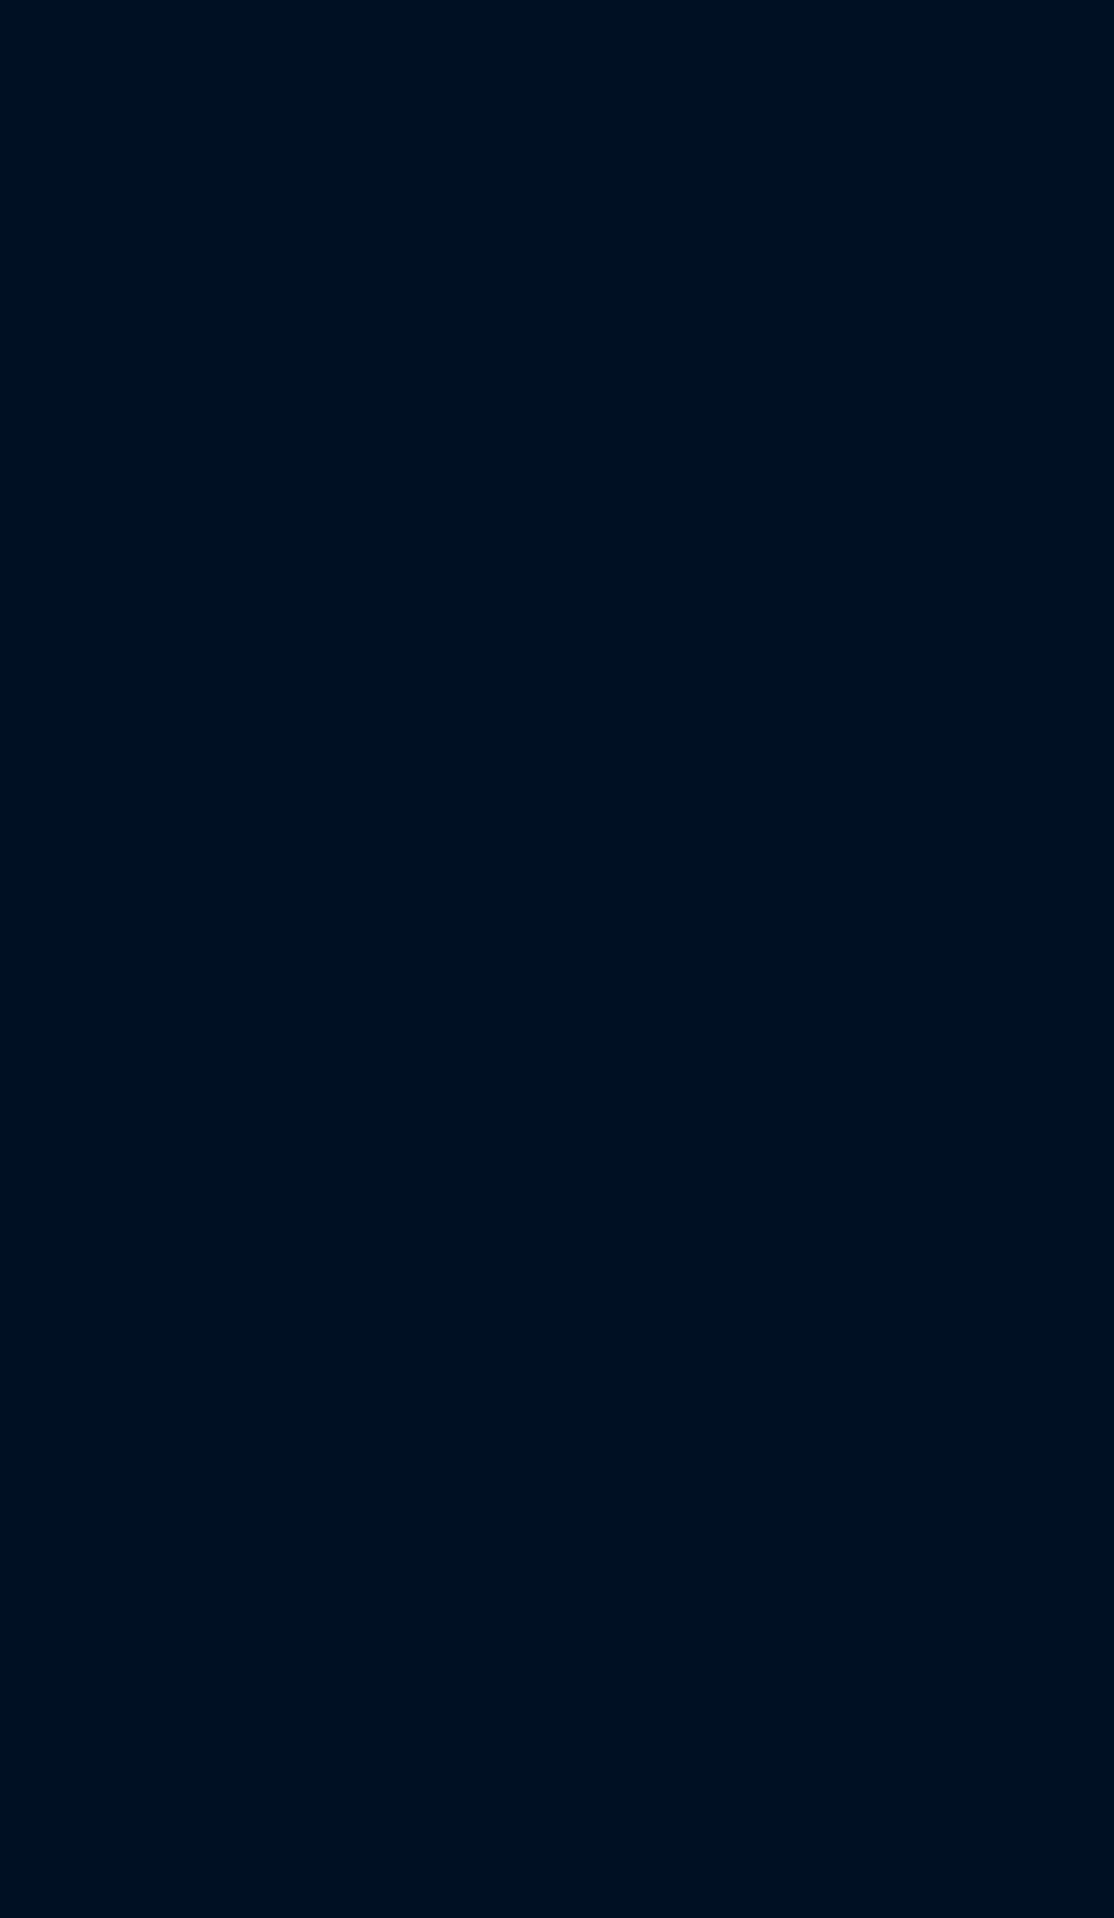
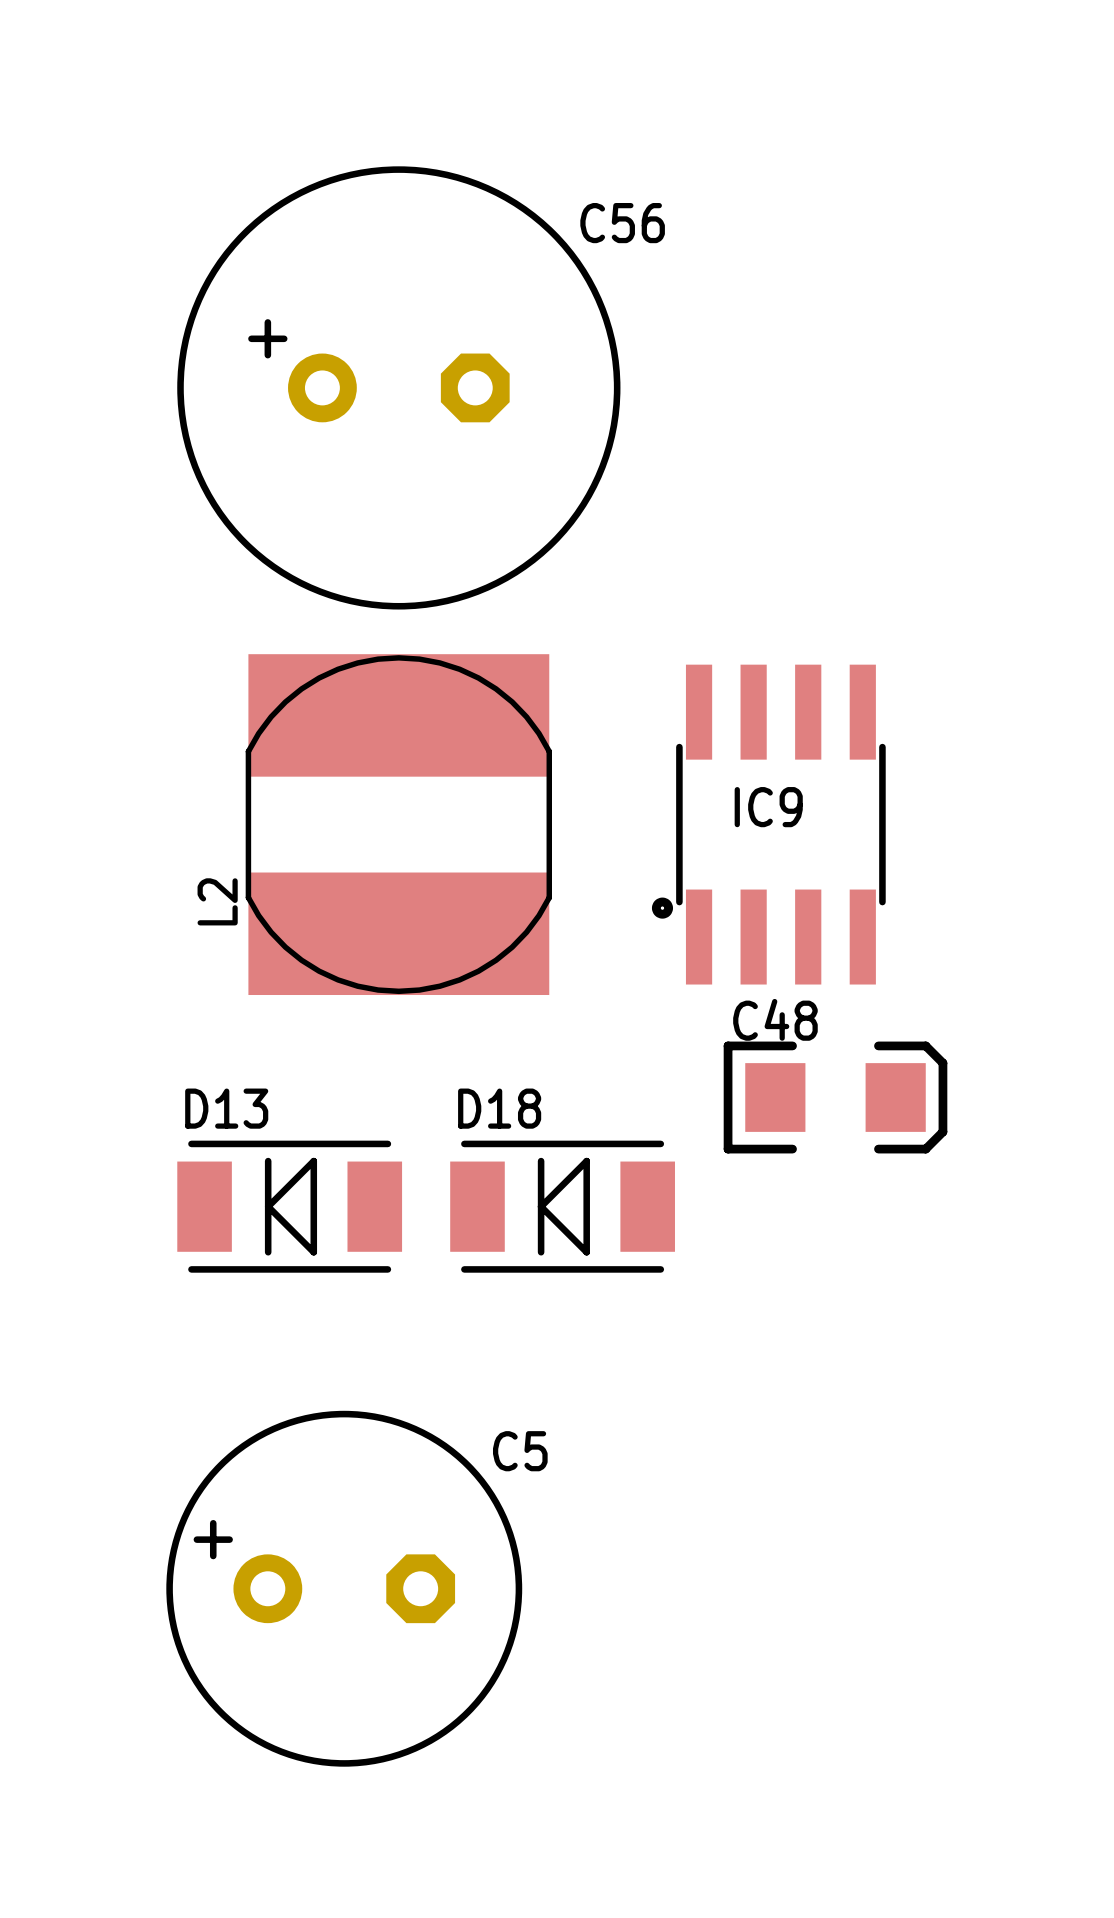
C56: none -> (398, 387)
L2: none -> (398, 824)
IC9: none -> (768, 824)
C48: none -> (835, 1097)
D13: none -> (289, 1206)
D18: none -> (562, 1206)
C5: none -> (344, 1588)

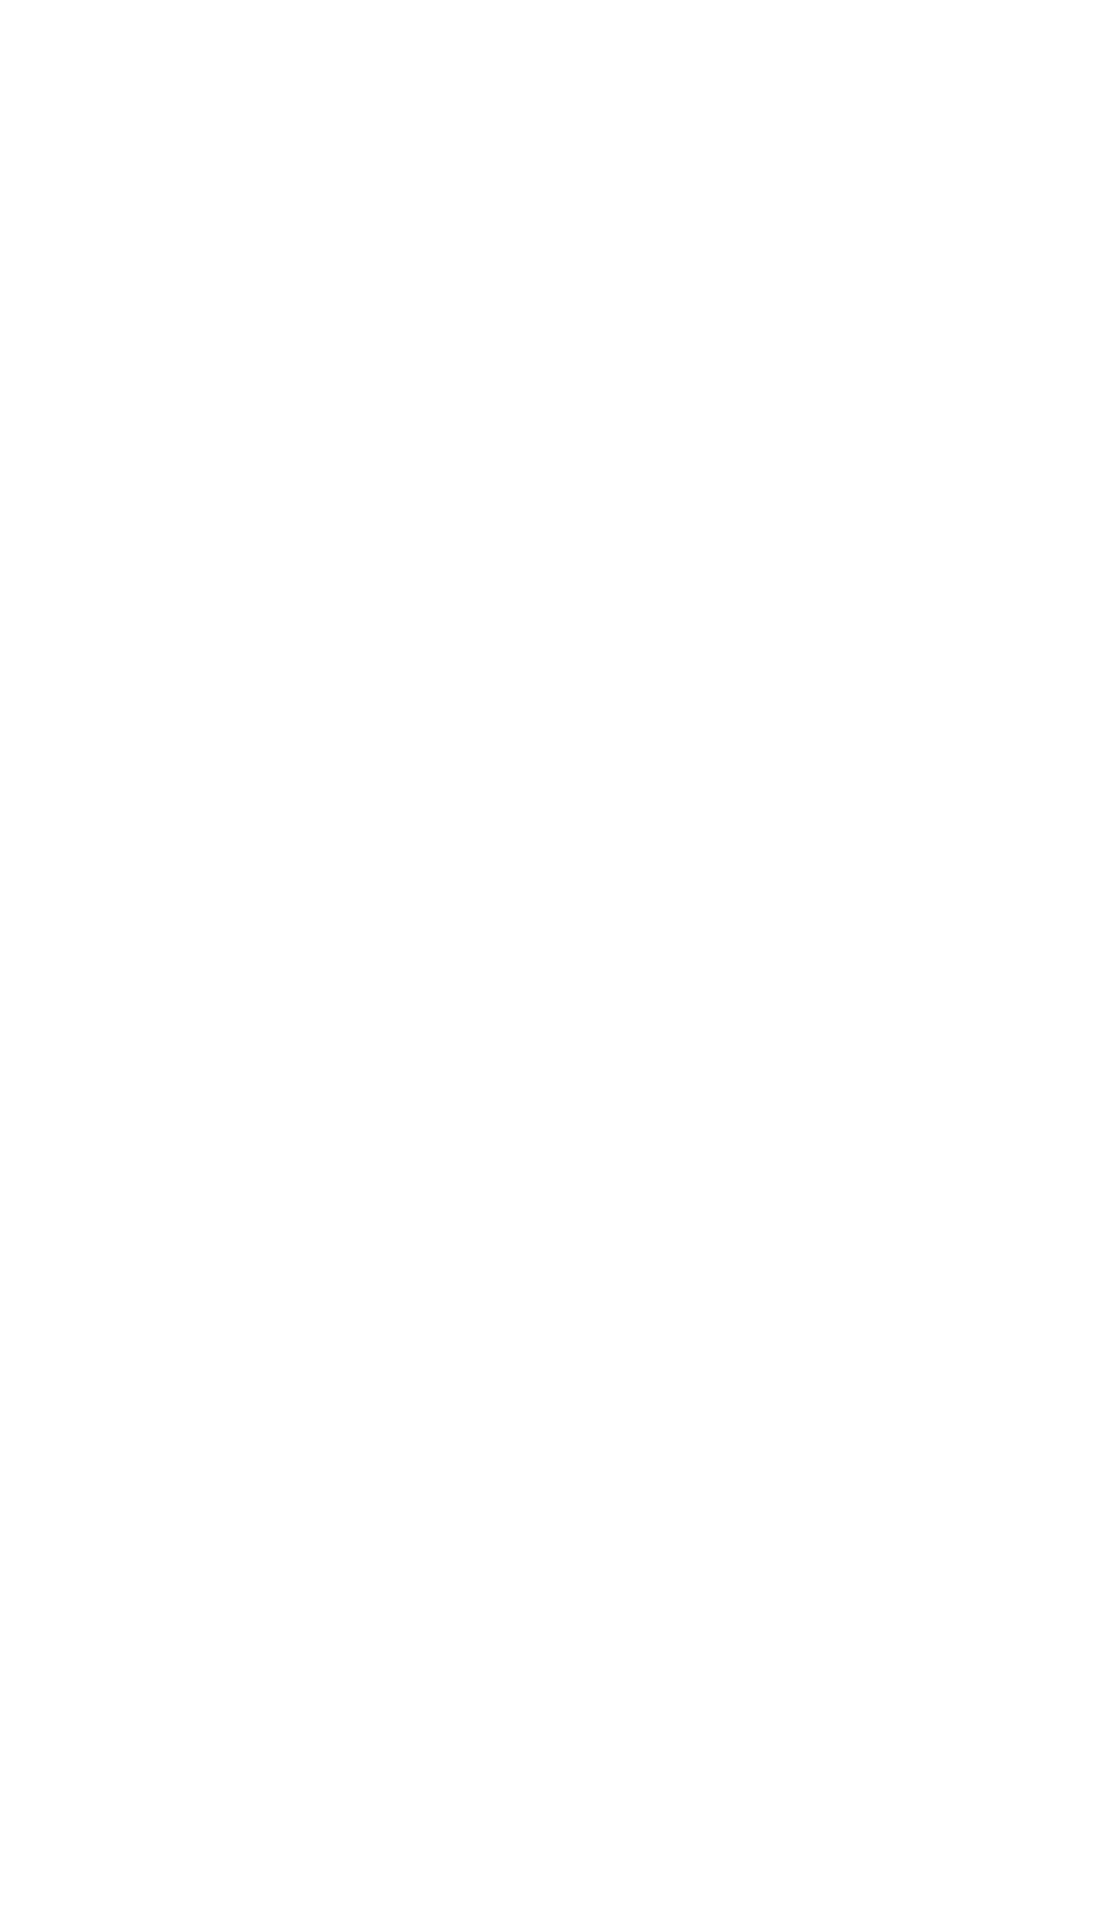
C56: (398, 387) -> none
L2: (398, 824) -> none
IC9: (768, 824) -> none
C48: (835, 1097) -> none
D13: (289, 1206) -> none
D18: (562, 1206) -> none
C5: (344, 1588) -> none

